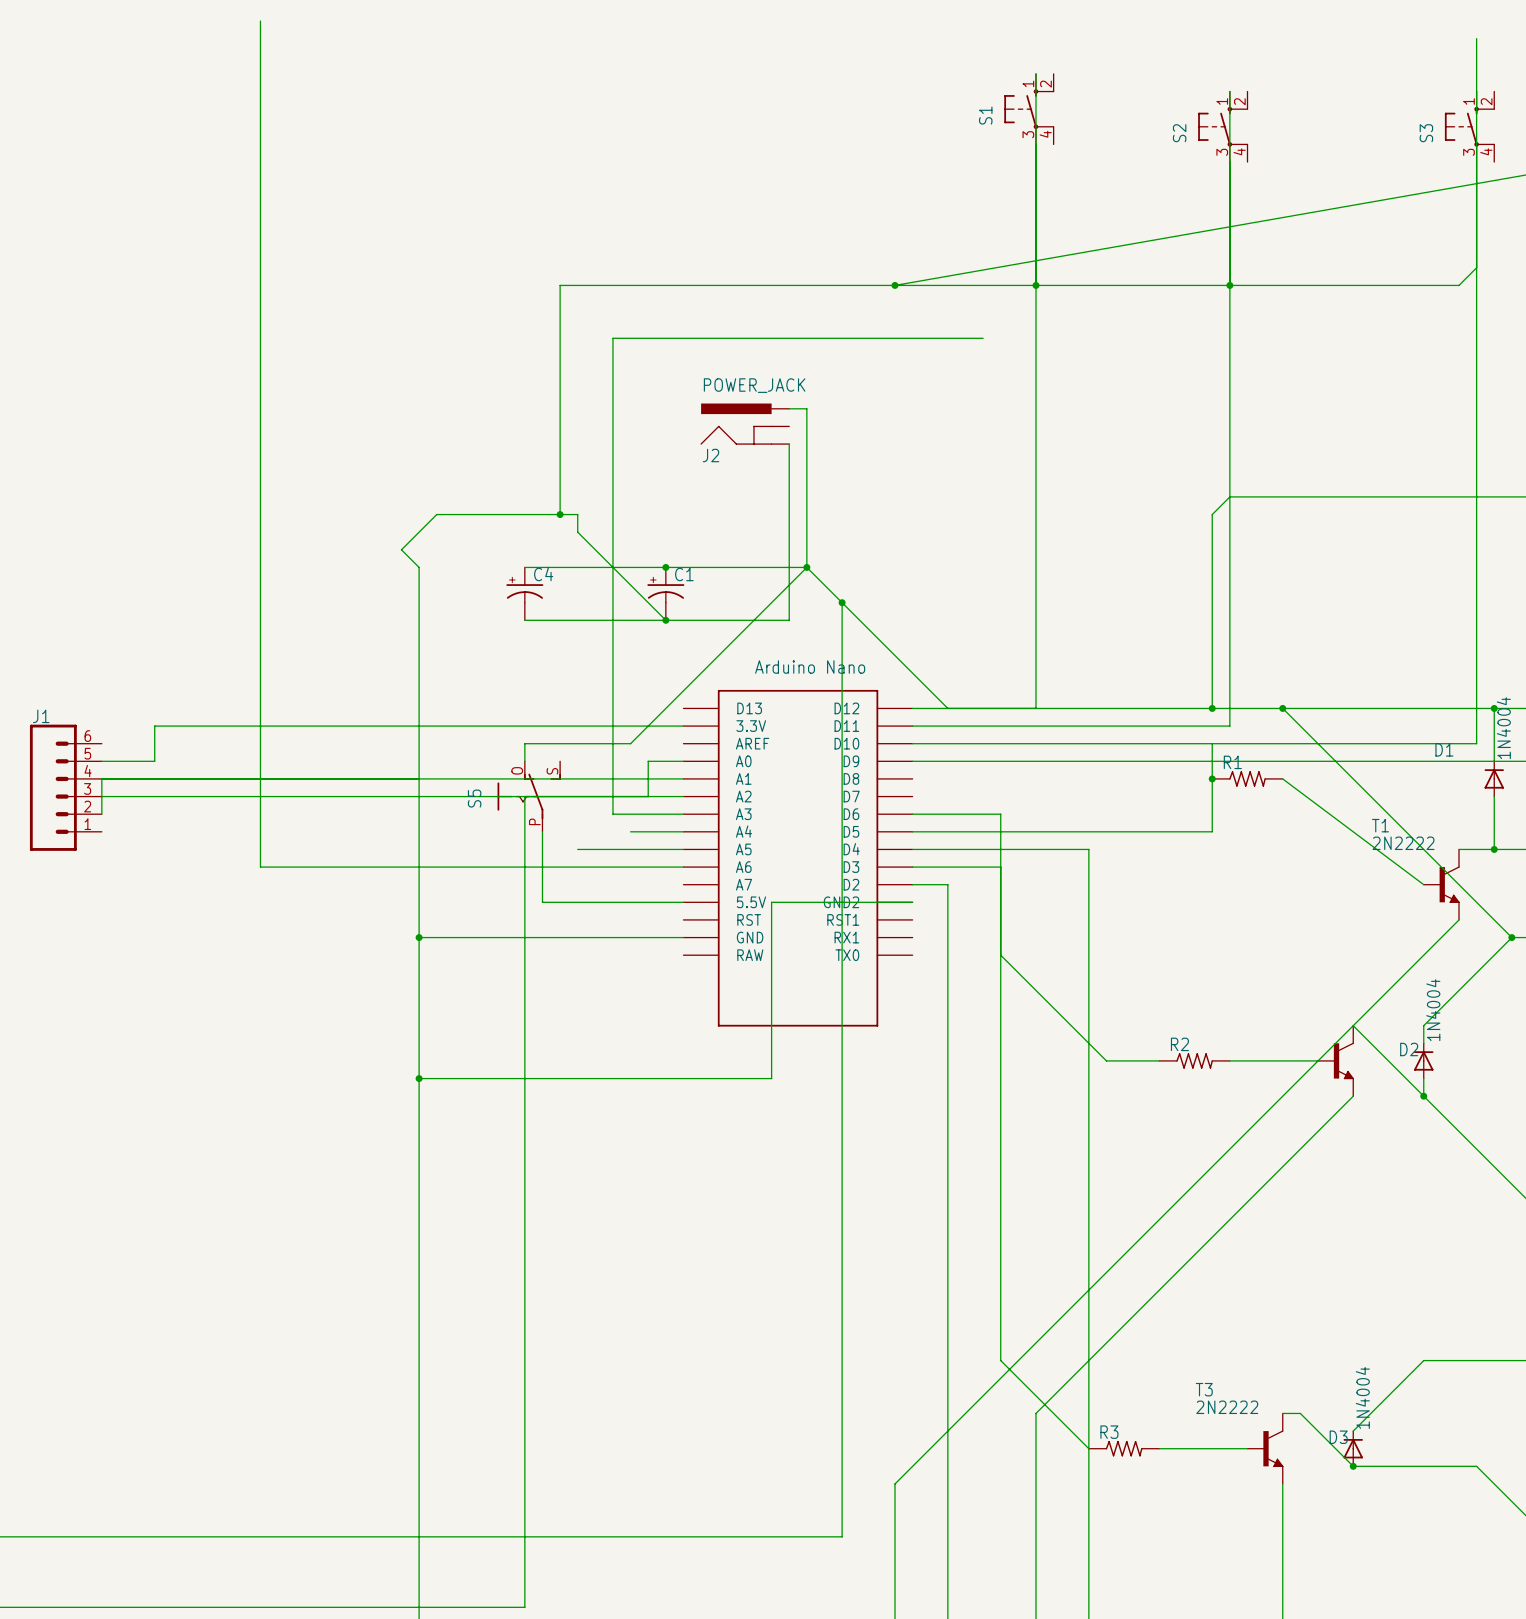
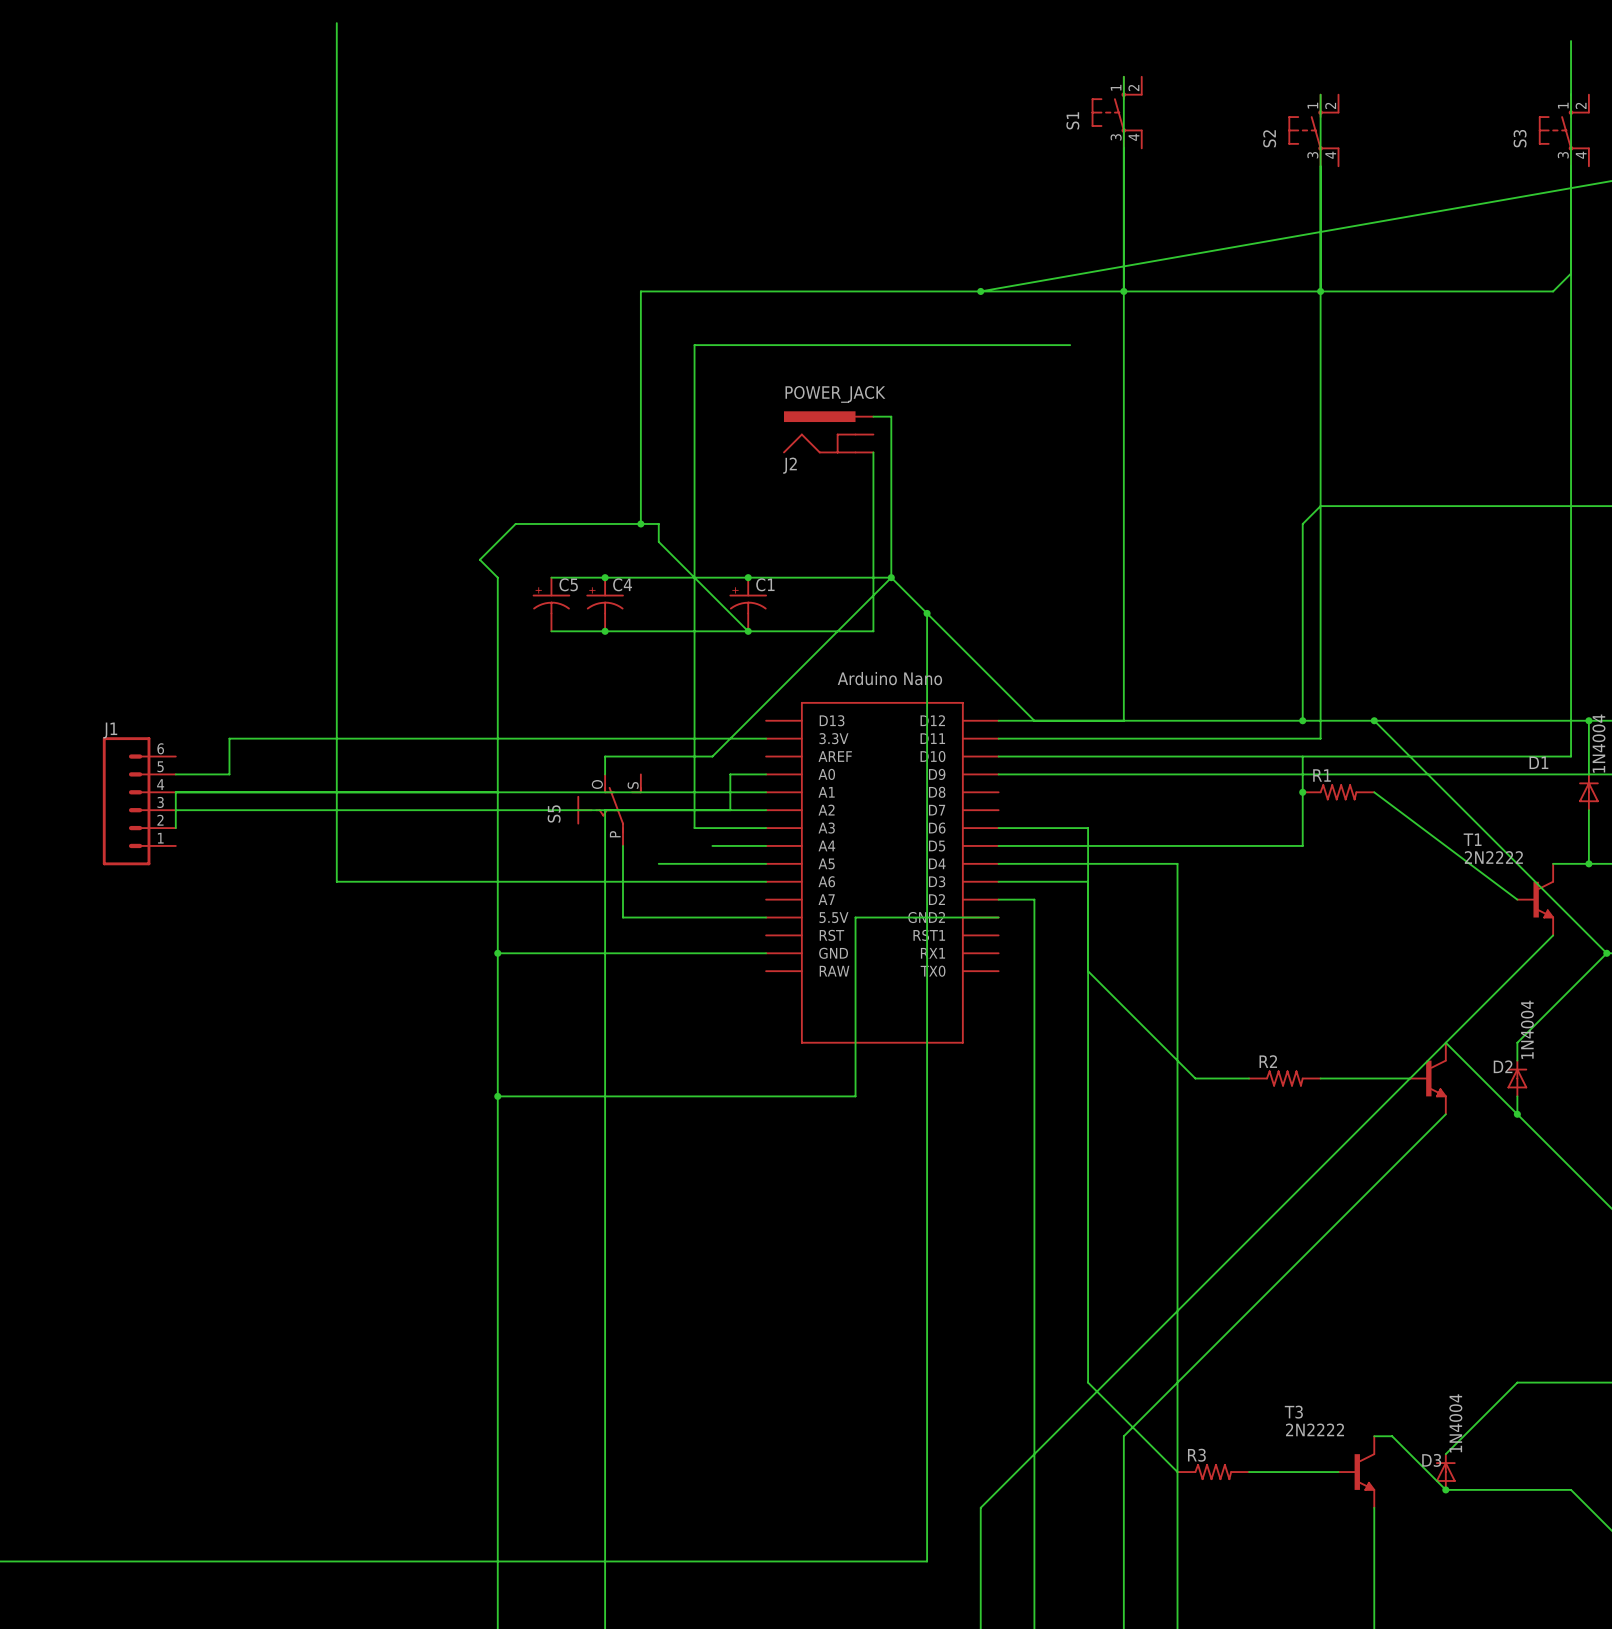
wire: none -> (551, 577) (605, 577)
junction: none -> (605, 577)
C5: none -> (551, 604)
wire: none -> (551, 631) (605, 631)
junction: none -> (605, 631)

